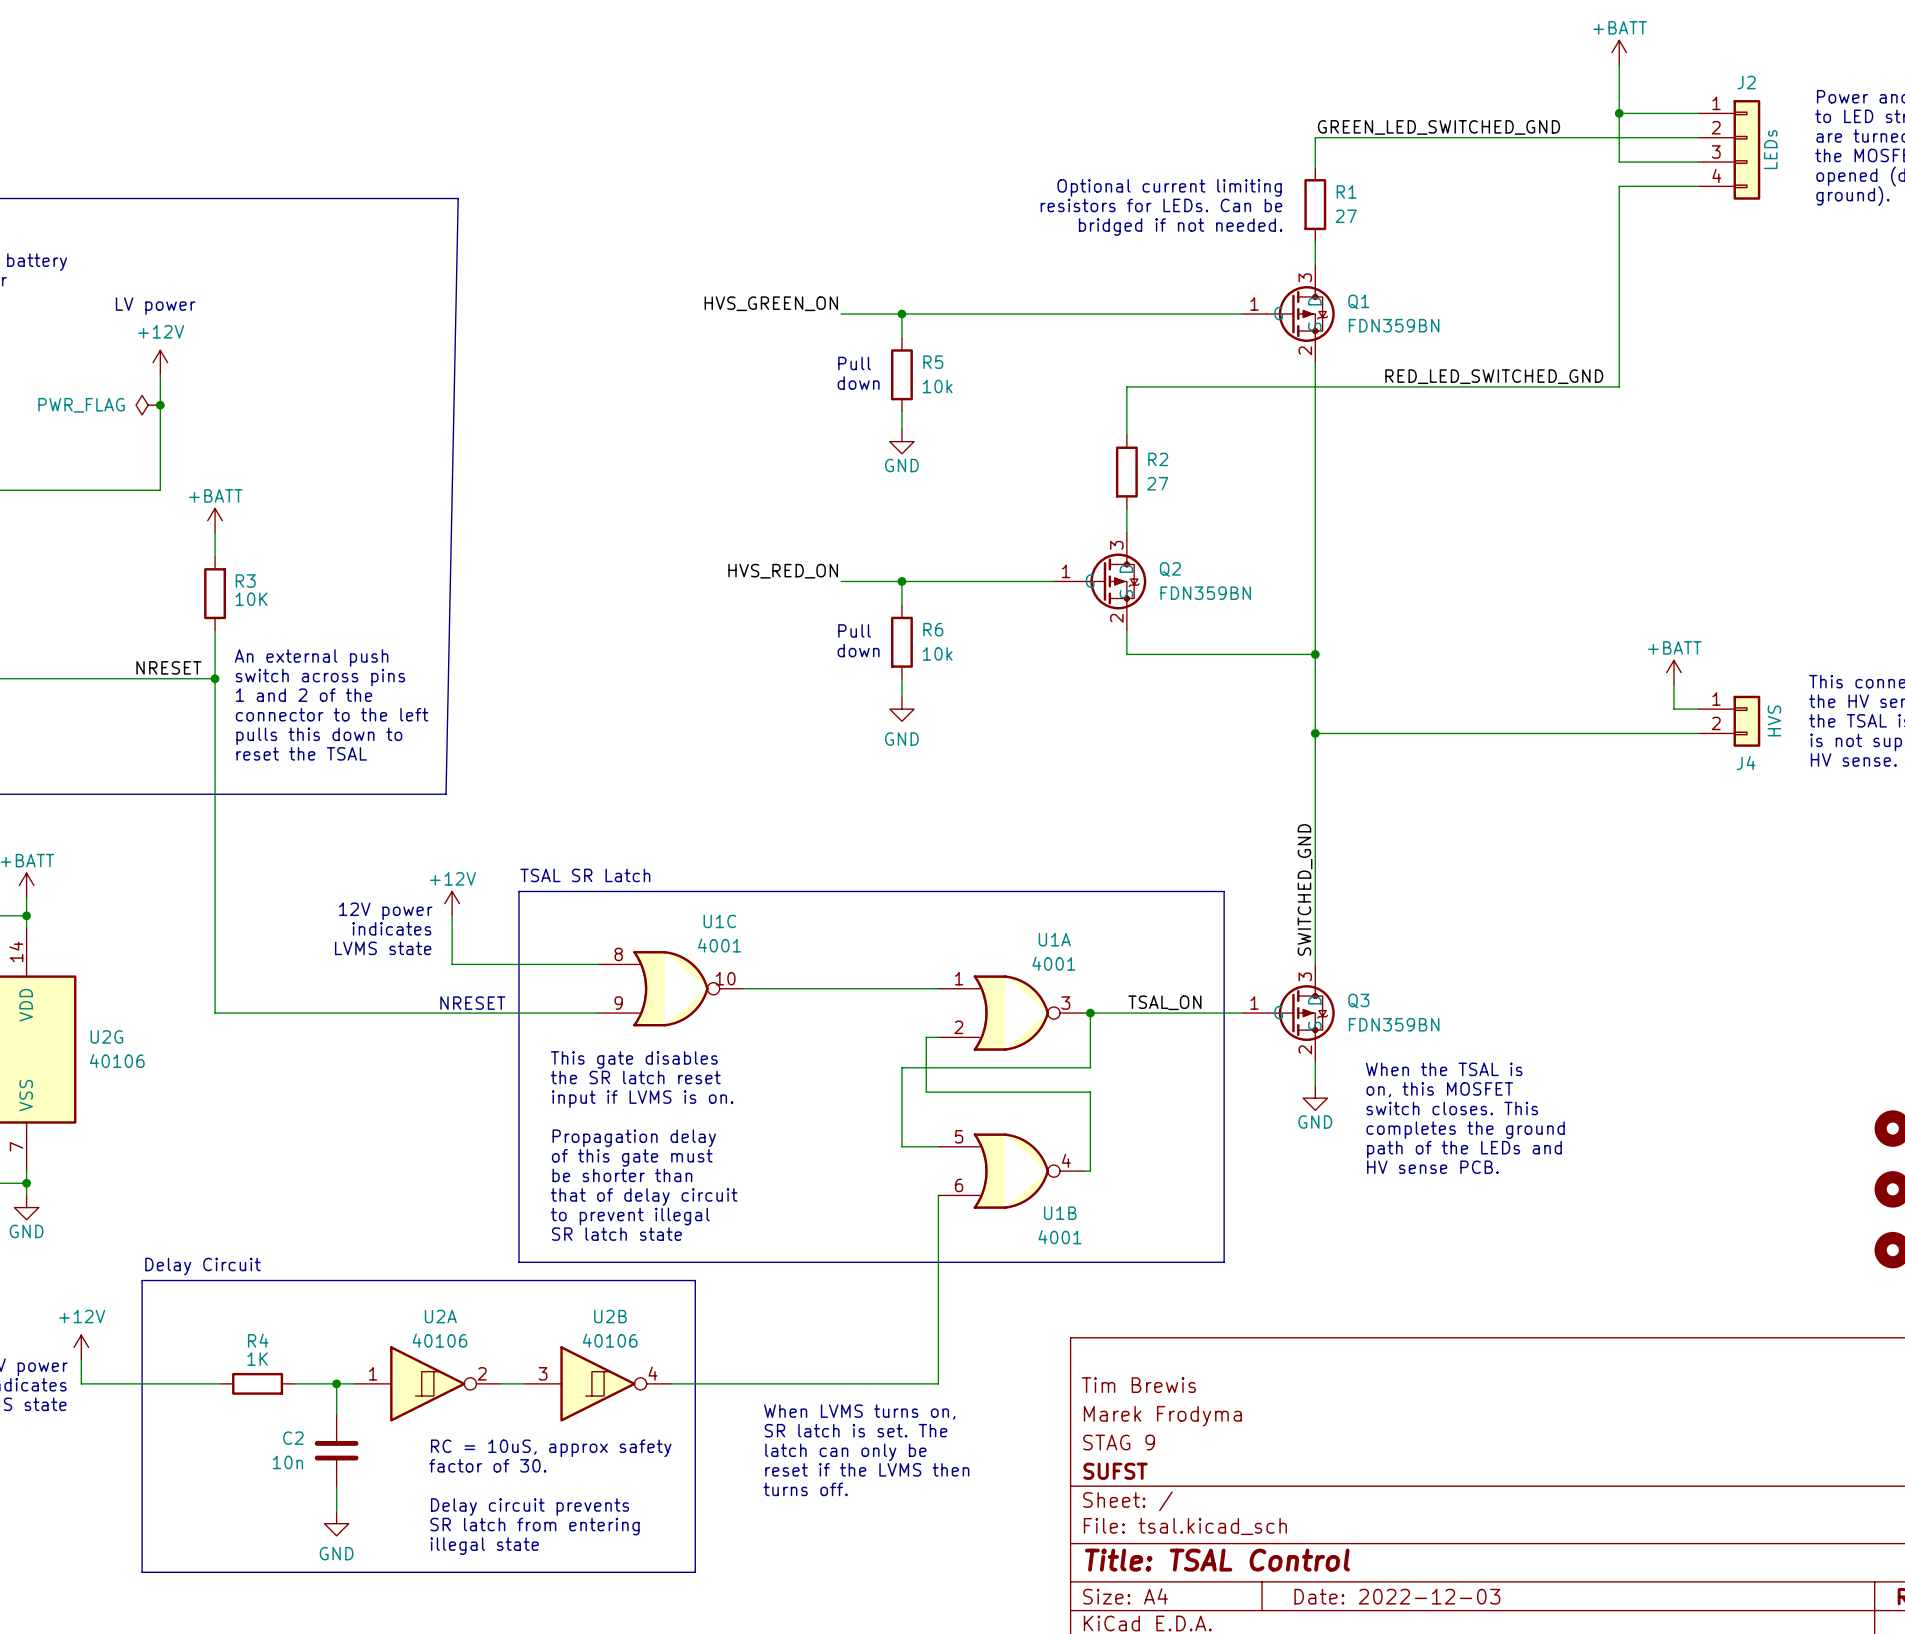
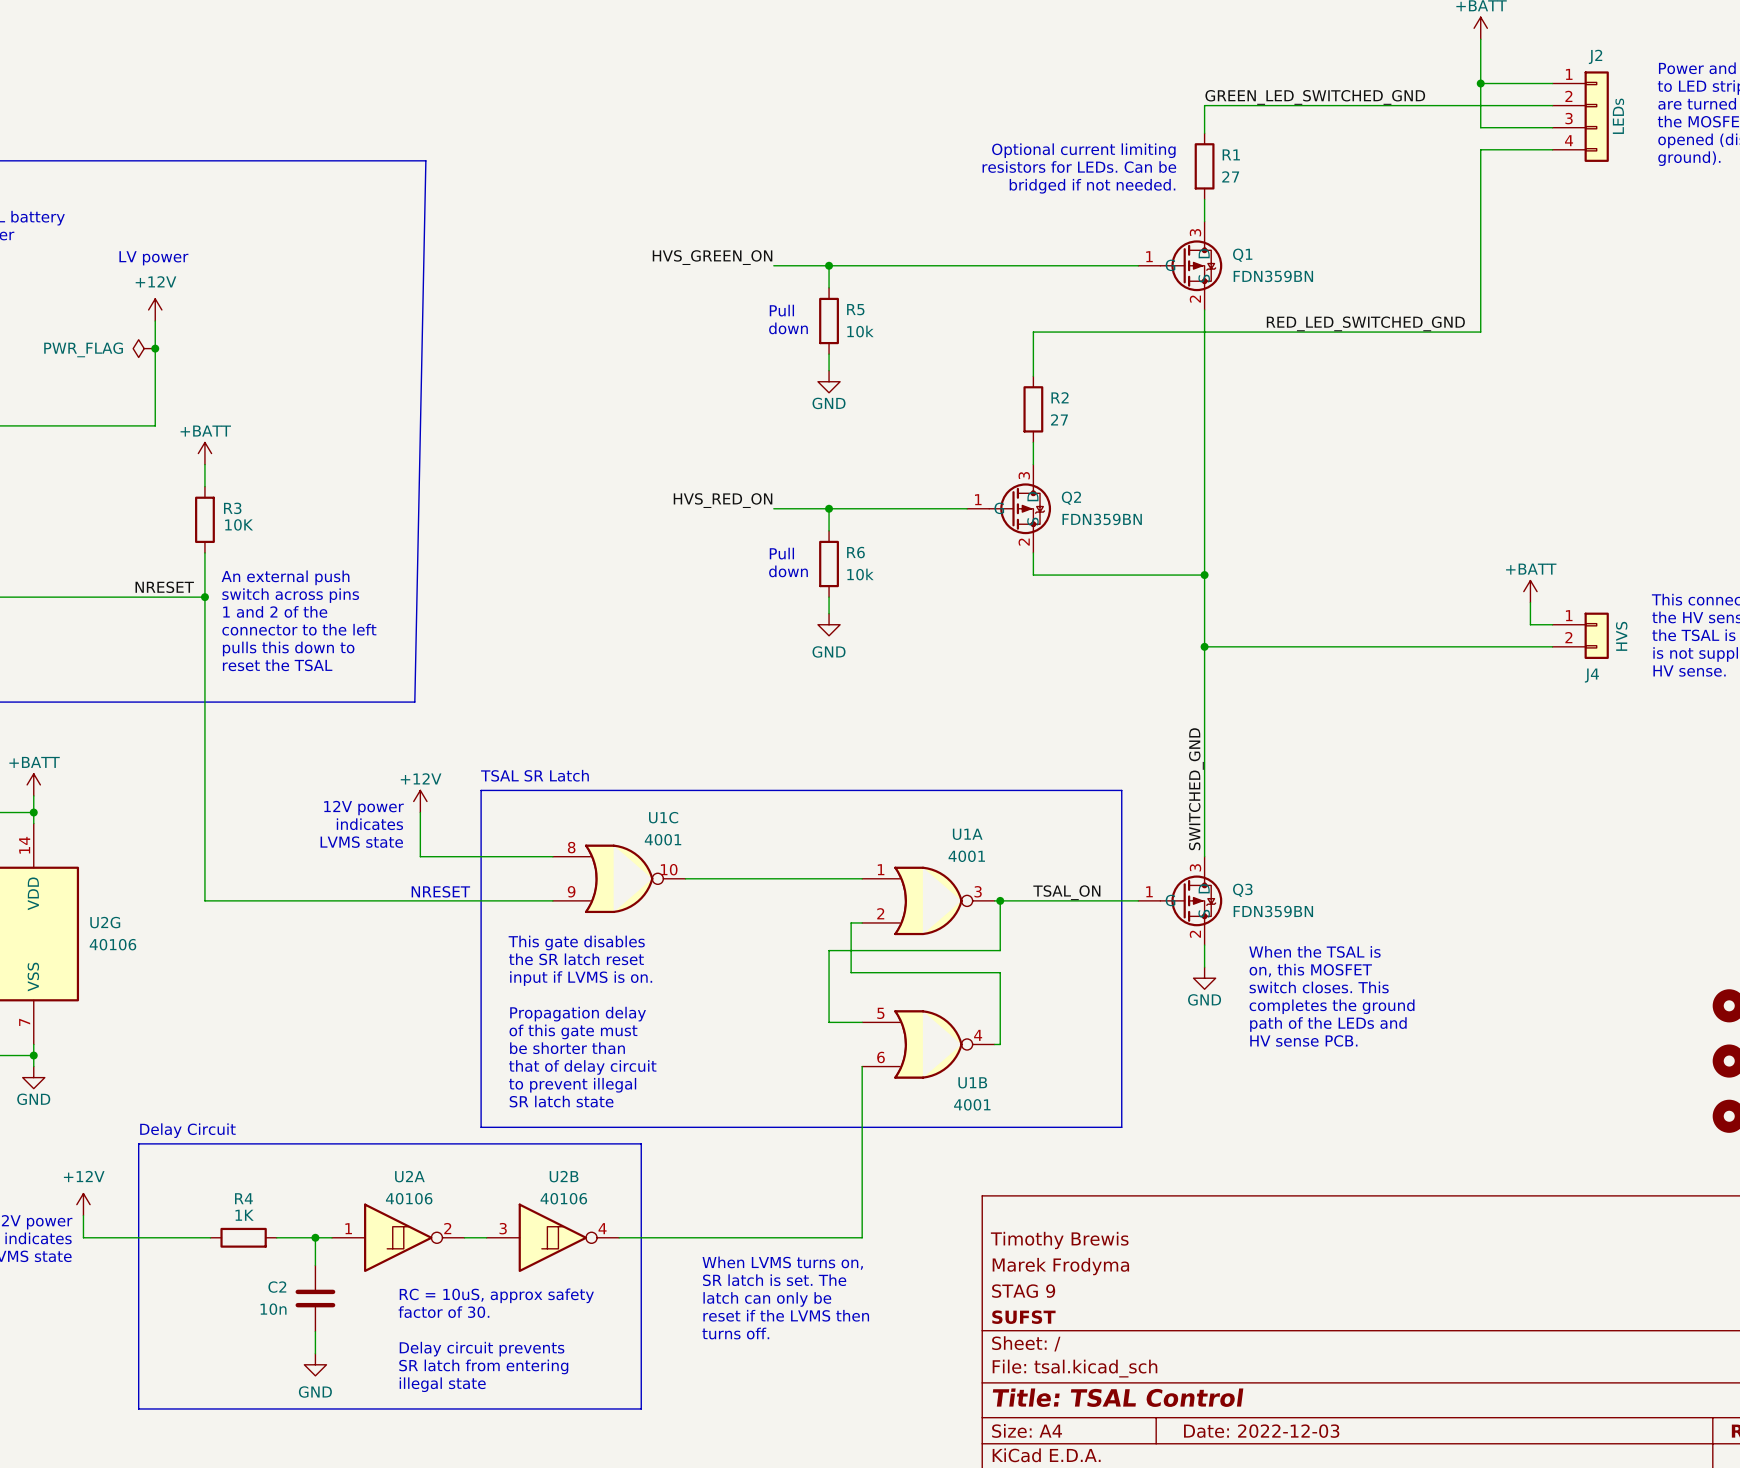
title block: Tim Brewis (1138, 1385) -> Timothy Brewis (1059, 1240)

